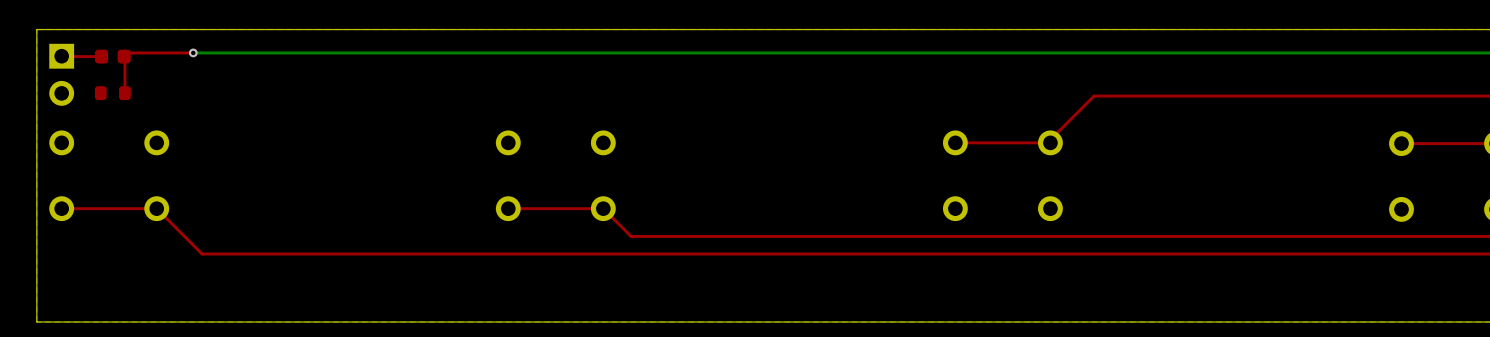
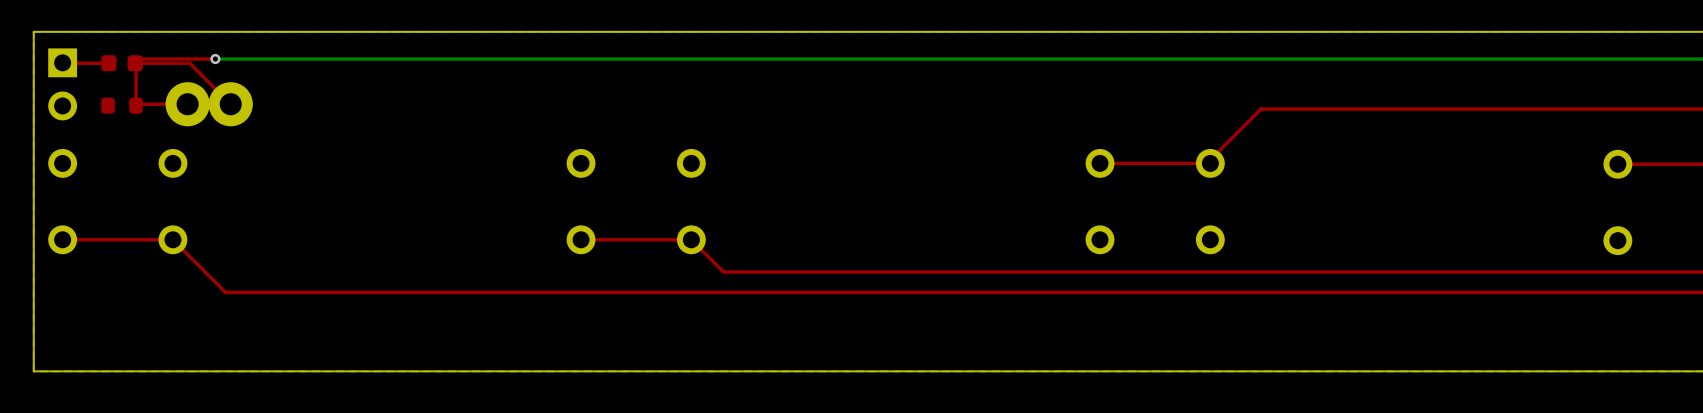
top track: none -> (135, 63) (189, 63) (230, 104)
top track: none -> (187, 104) (136, 105)
part: none -> (209, 104)

